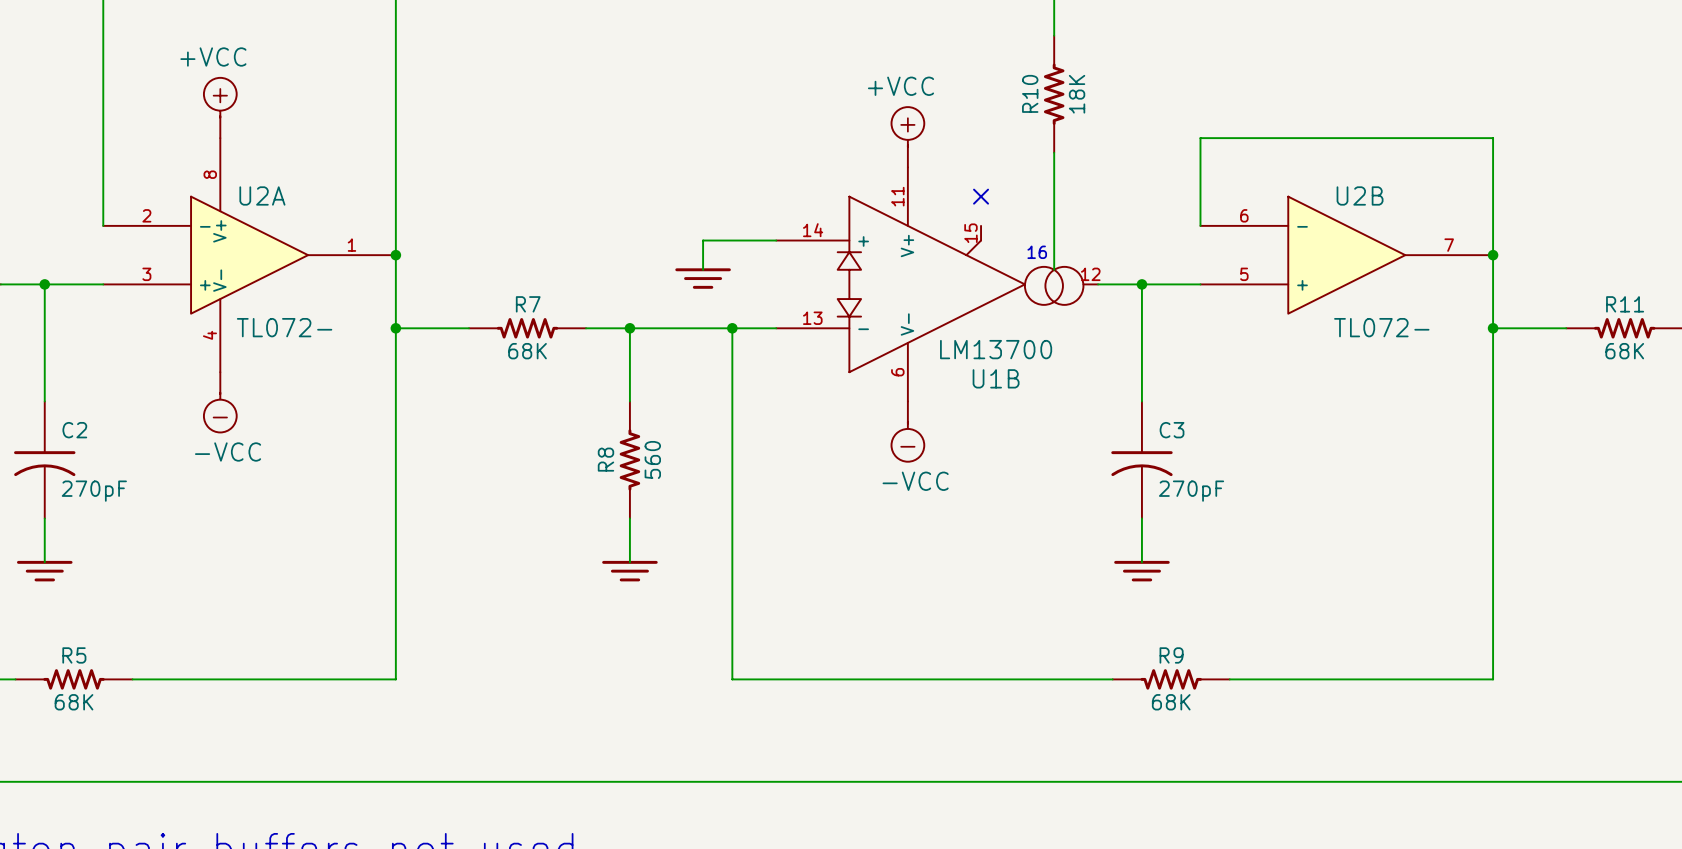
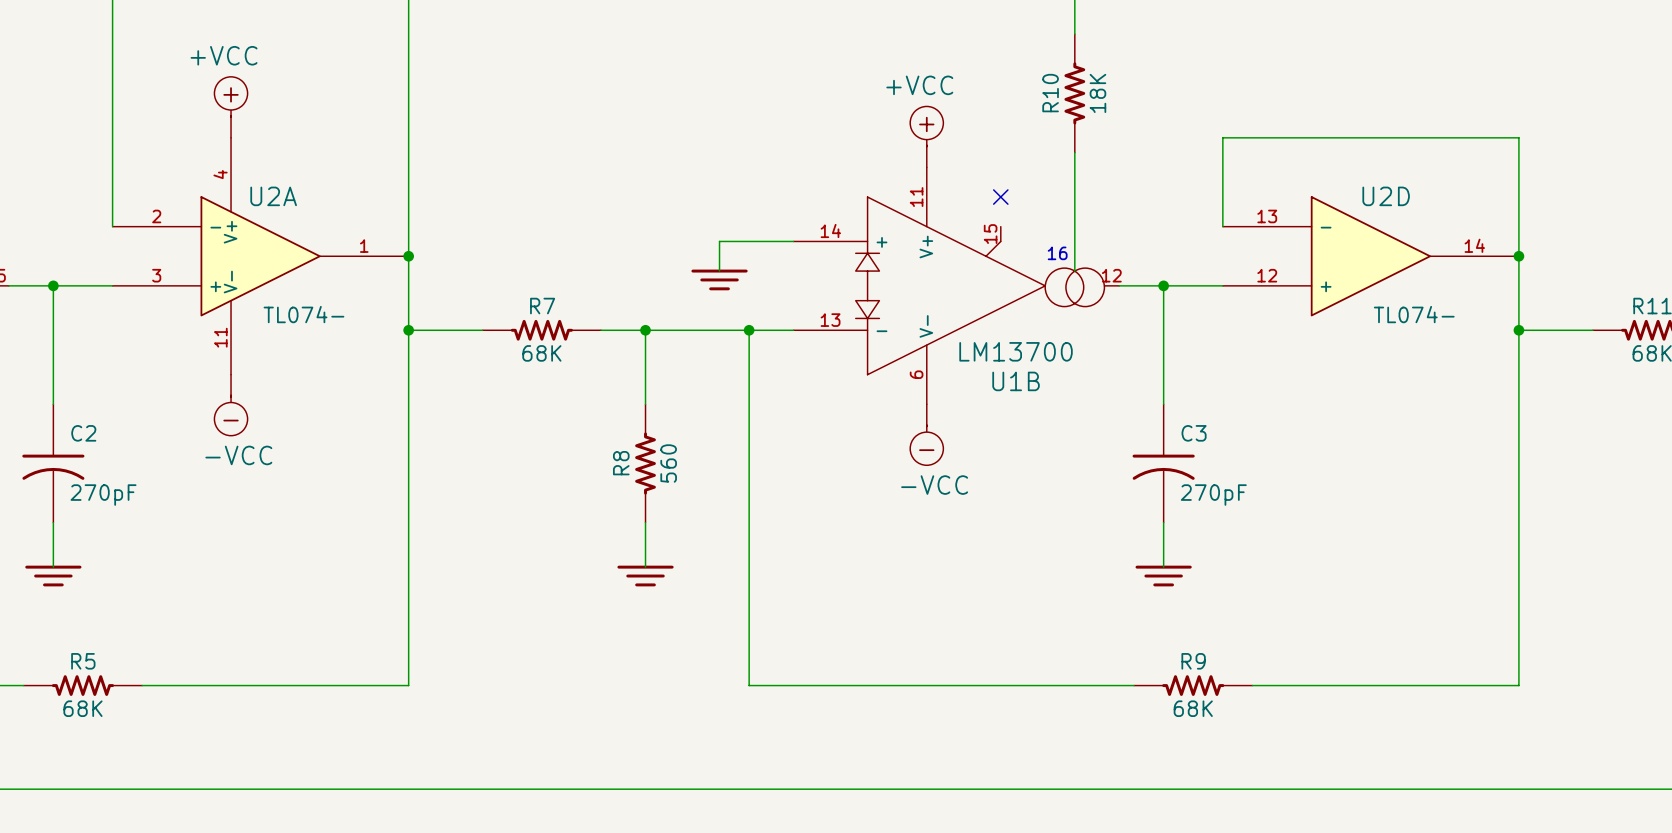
U2A pin number: 8 (210, 174) -> 4 (220, 174)
U2B name: U2B (1360, 195) -> U2D (1386, 196)
U2B pin number: 6 (1244, 215) -> 13 (1267, 216)
U2B pin number: 7 (1449, 245) -> 14 (1474, 245)
U2B pin number: 5 (1244, 274) -> 12 (1267, 275)
U2A value: TL072- (284, 327) -> TL074- (303, 314)
U2B value: TL072- (1381, 327) -> TL074- (1414, 314)
U2A pin number: 4 (209, 335) -> 11 (220, 337)

